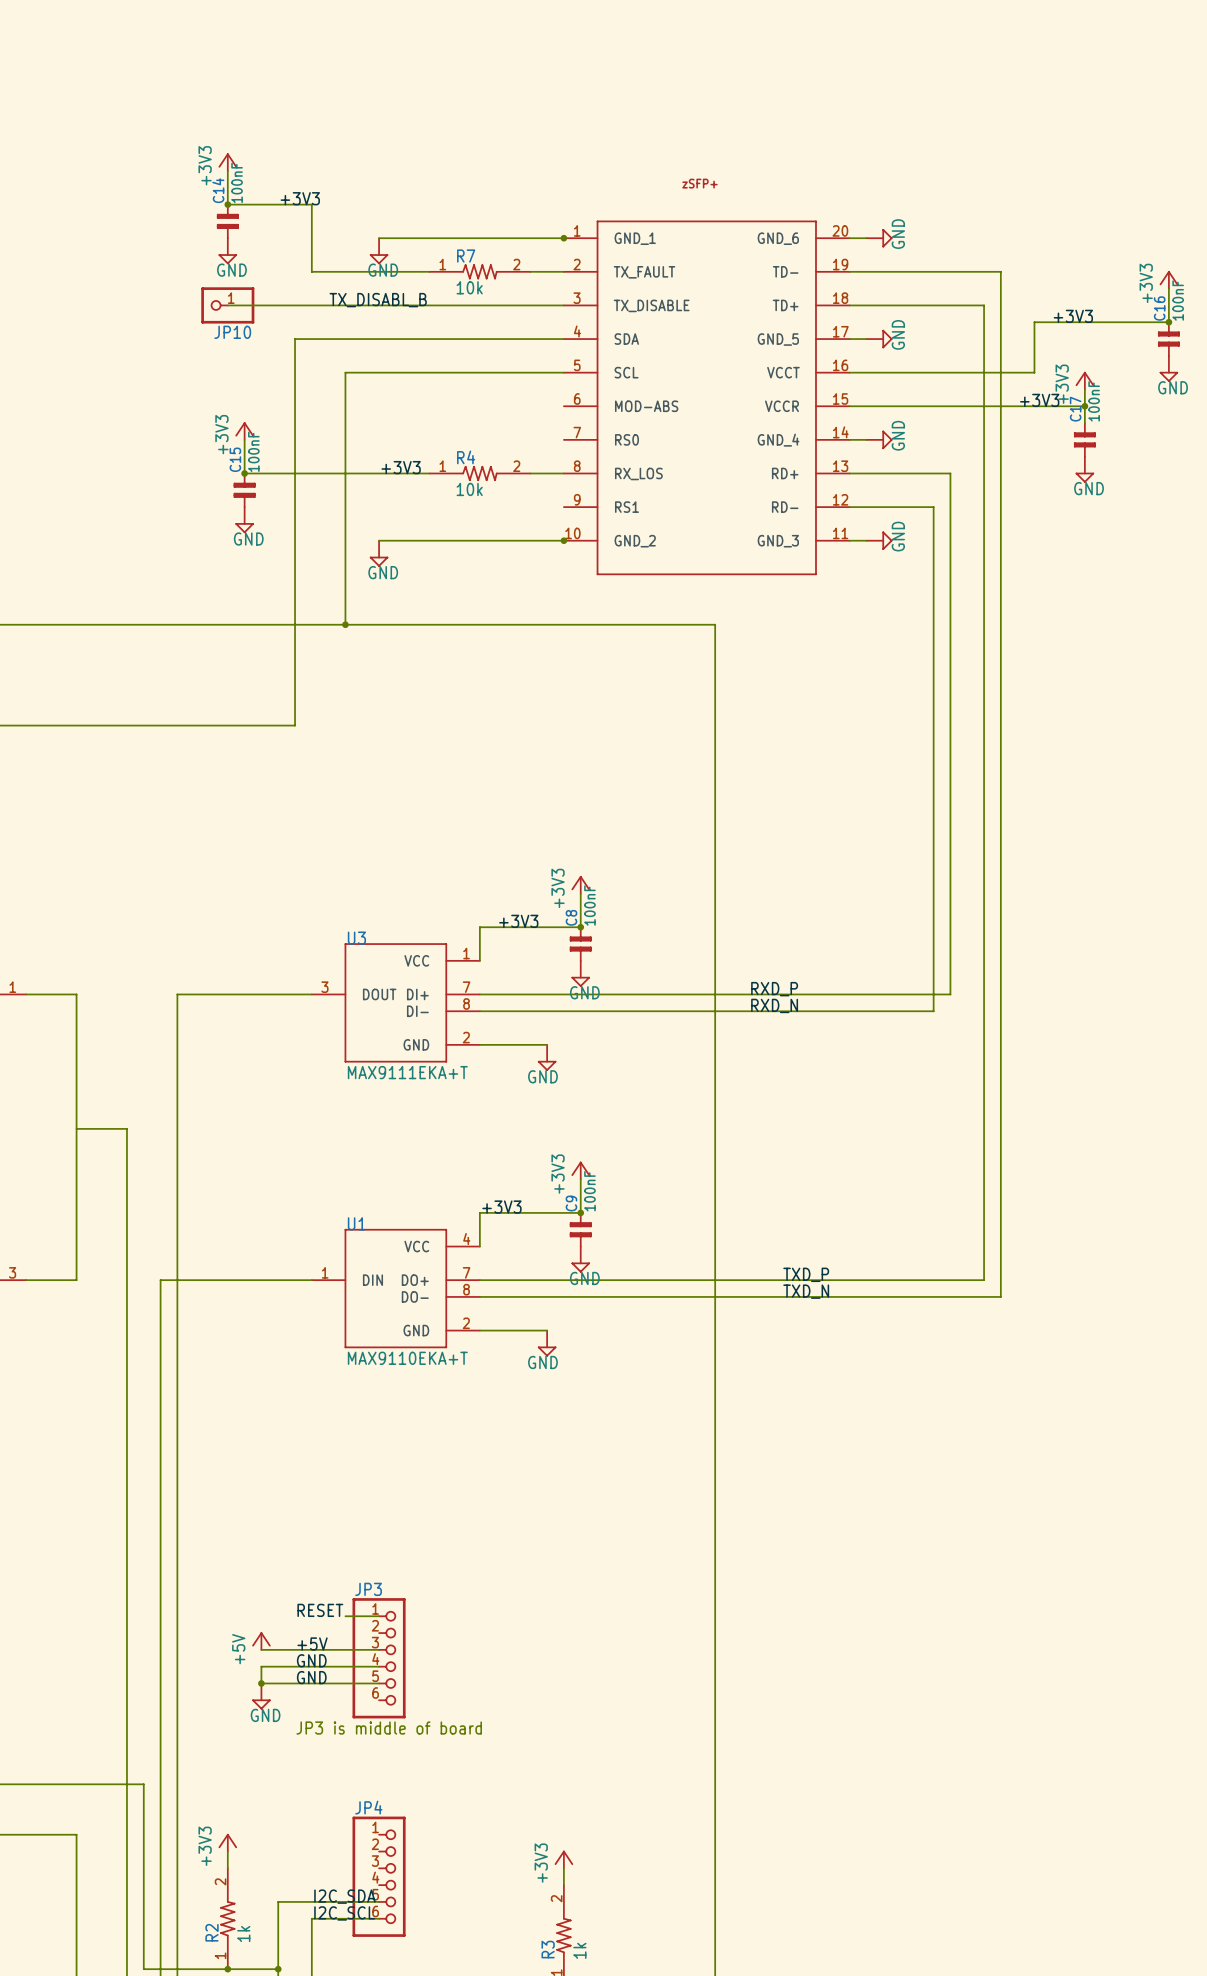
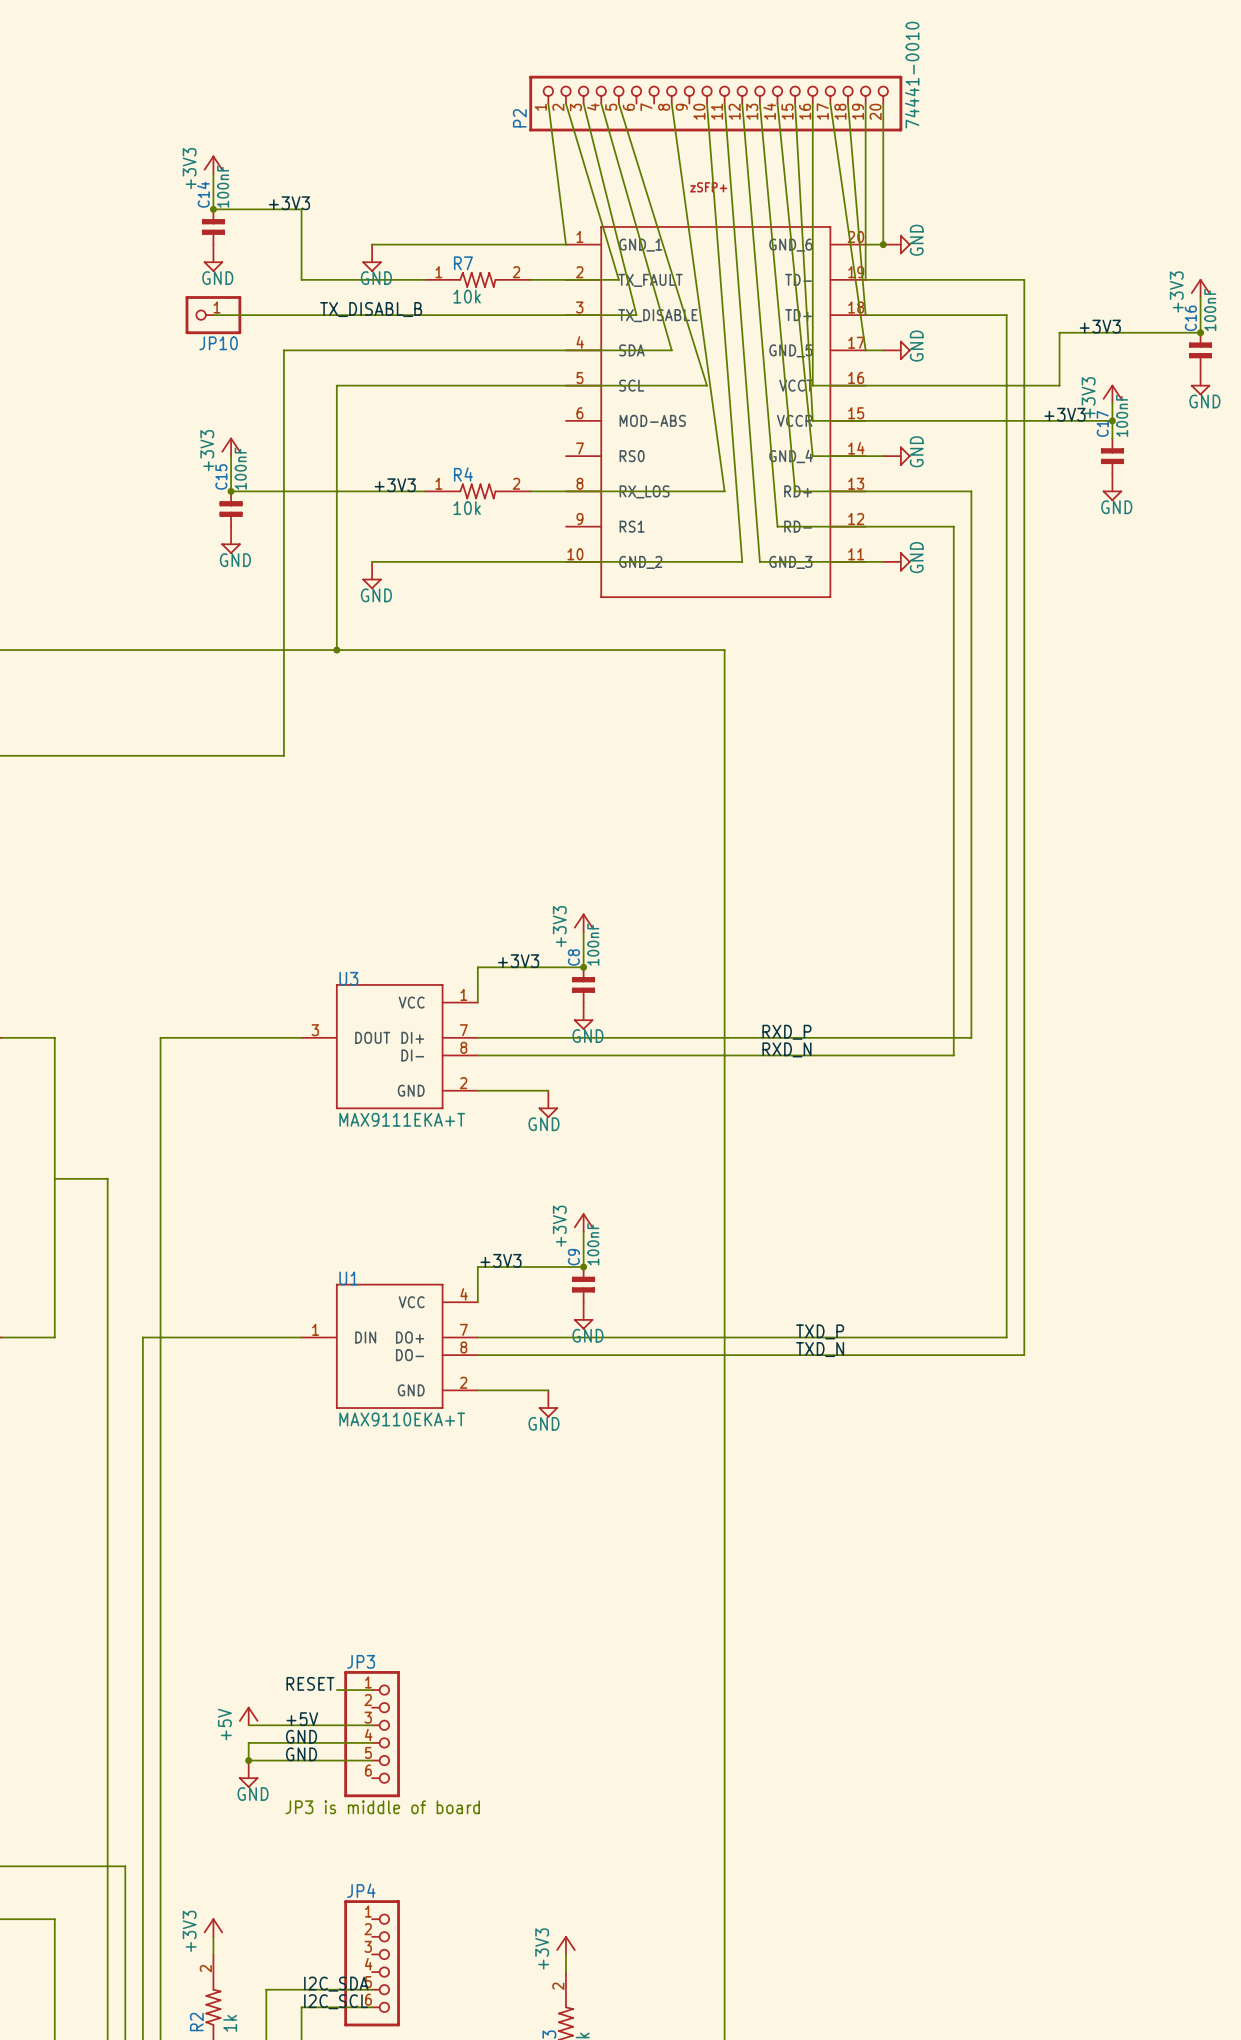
wire: none -> (548, 103) (565, 244)
wire: none -> (565, 103) (618, 279) (565, 279)
wire: none -> (583, 103) (636, 315) (565, 315)
wire: none -> (601, 103) (671, 350) (565, 350)
wire: none -> (618, 103) (706, 385) (565, 385)
wire: none -> (671, 103) (724, 491) (565, 491)
wire: none -> (706, 103) (742, 561) (565, 561)
P2: none -> 74441-0010 (715, 103)
wire: none -> (724, 103) (759, 561) (865, 561)
wire: none -> (742, 103) (777, 526) (865, 526)
wire: none -> (759, 103) (795, 491) (865, 491)
wire: none -> (777, 103) (812, 456) (865, 456)
wire: none -> (795, 103) (812, 420) (865, 420)
wire: none -> (812, 103) (812, 385) (865, 385)
wire: none -> (830, 103) (865, 350)
wire: none -> (848, 103) (865, 315)
wire: none -> (865, 103) (865, 279)
wire: none -> (883, 103) (883, 244)
junction: (563, 238) -> none
junction: none -> (883, 244)
junction: (563, 540) -> none

